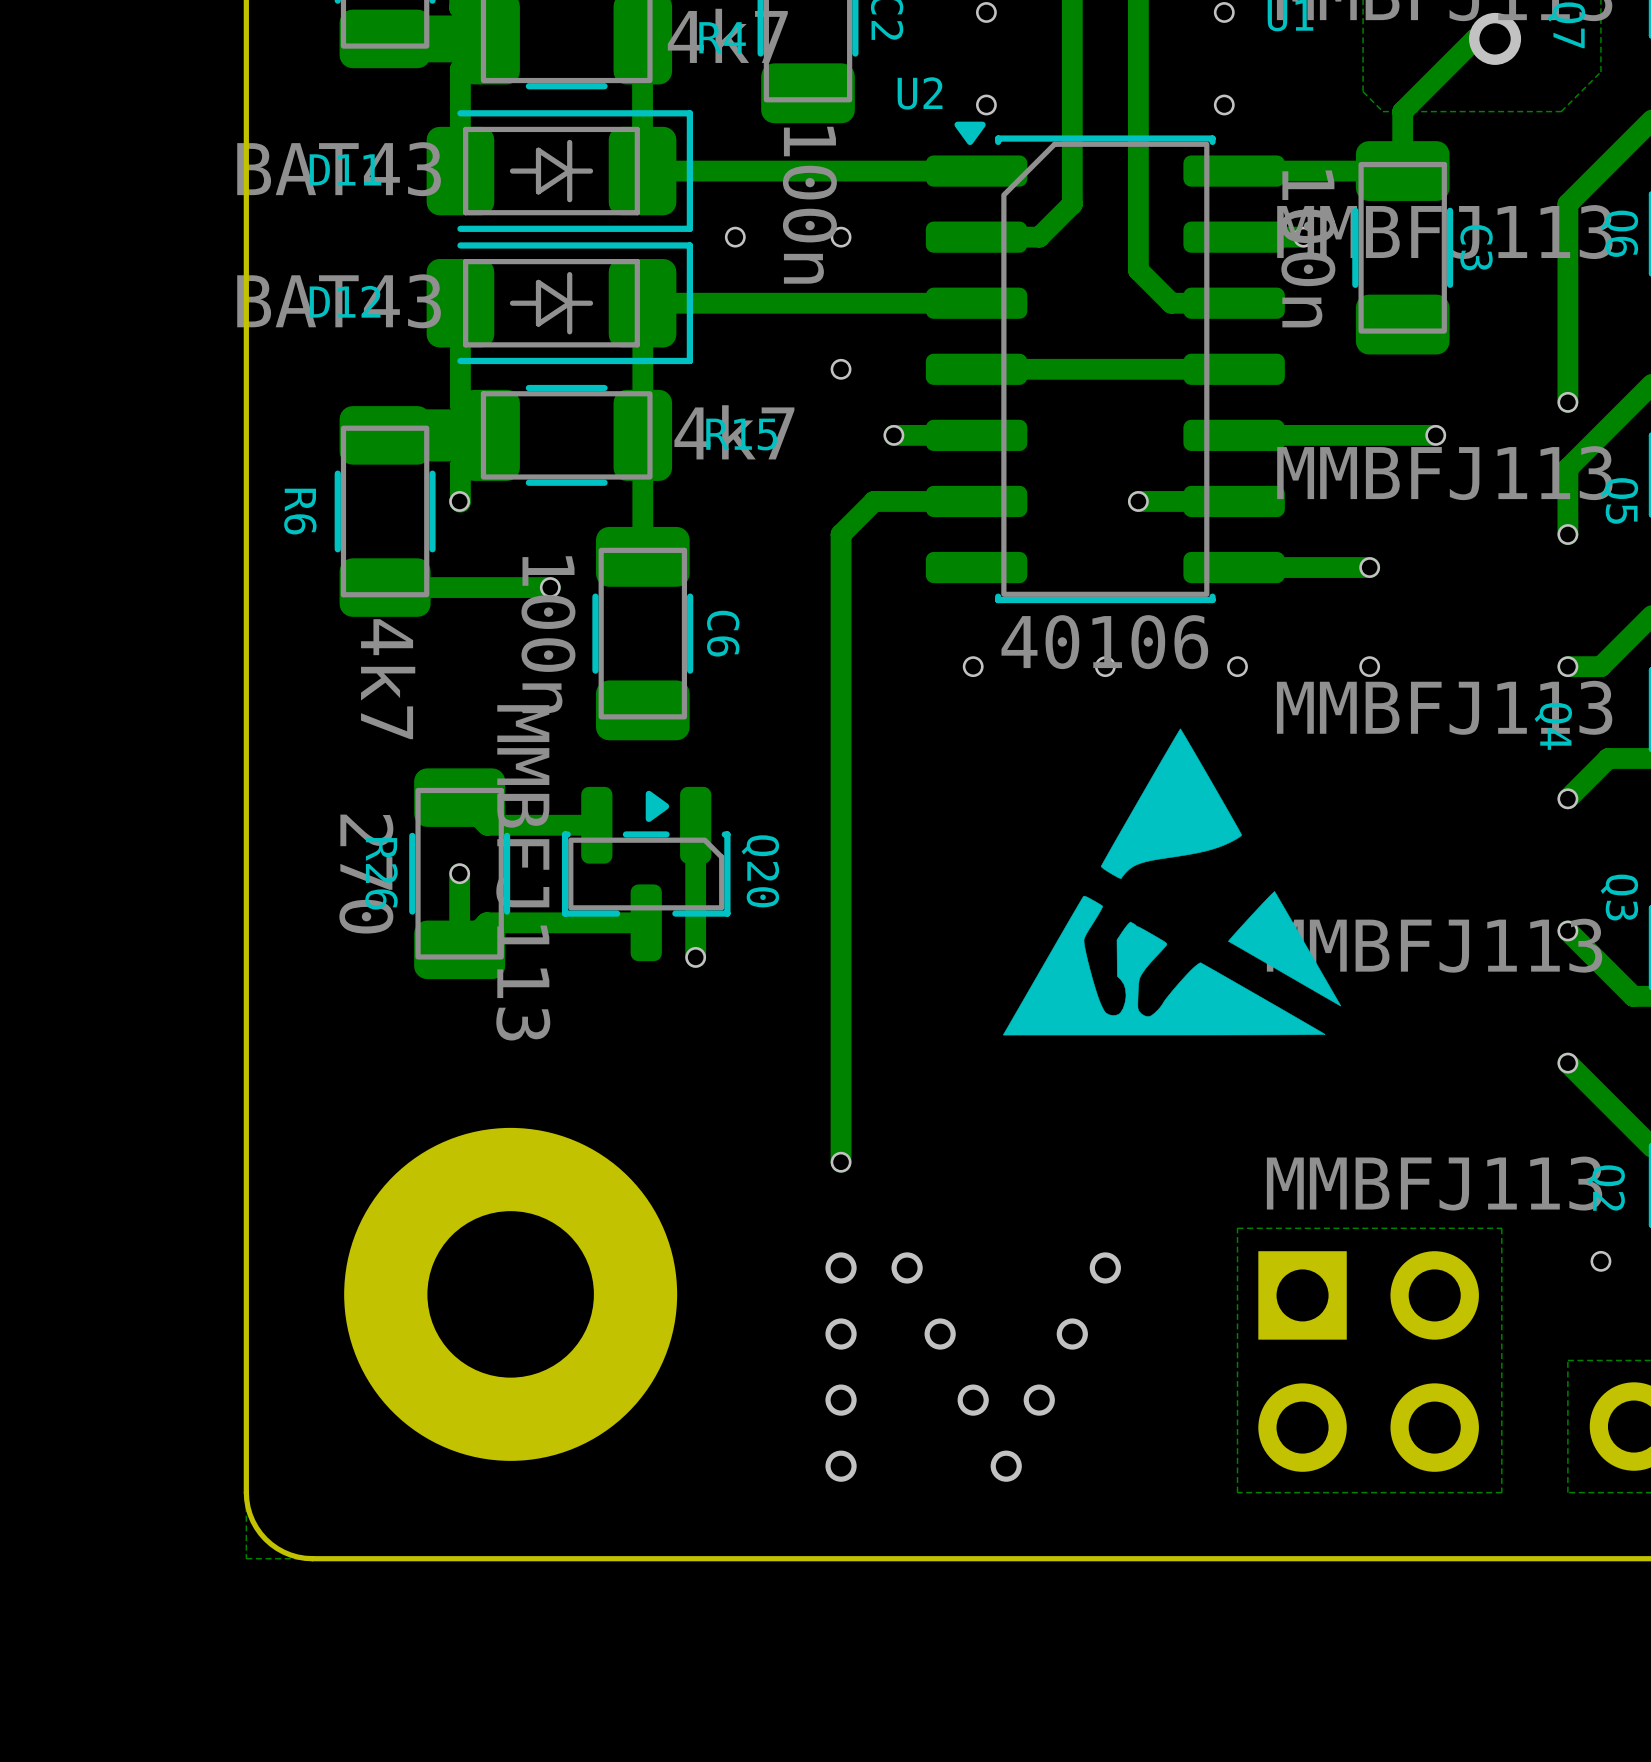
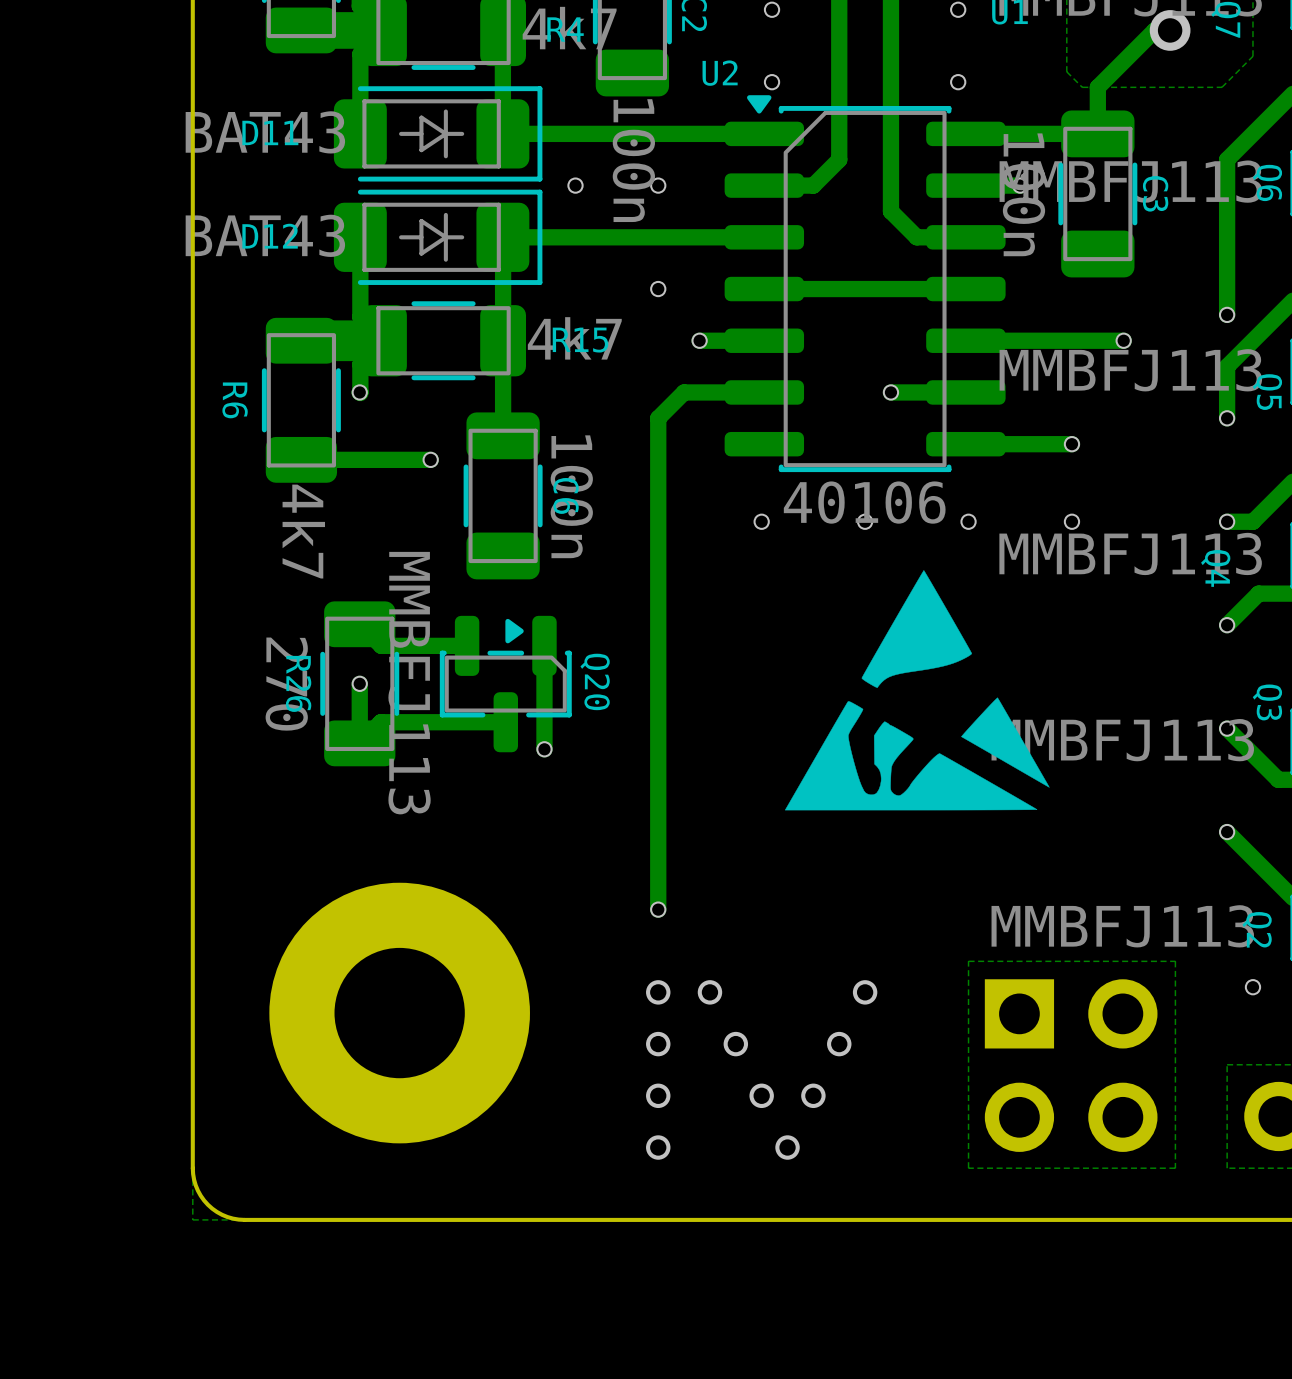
C6 value position: 100n (548, 634) -> 100n (571, 496)

